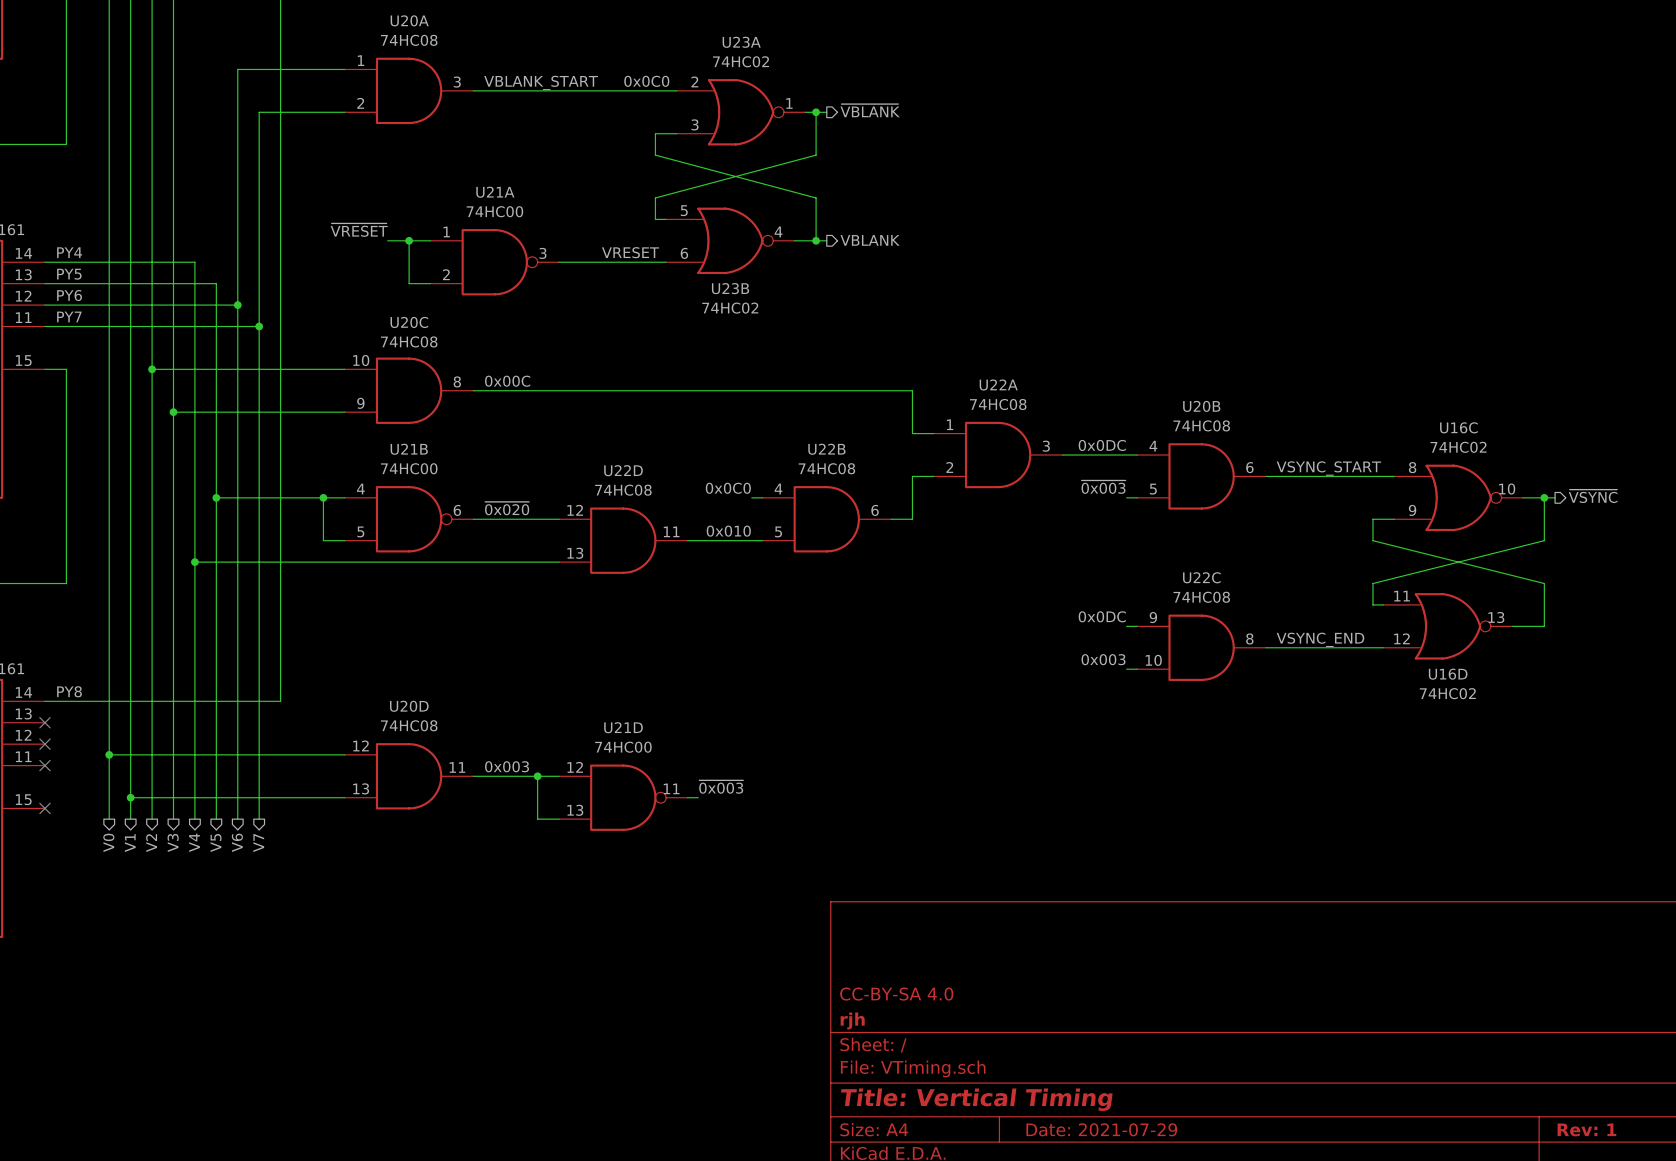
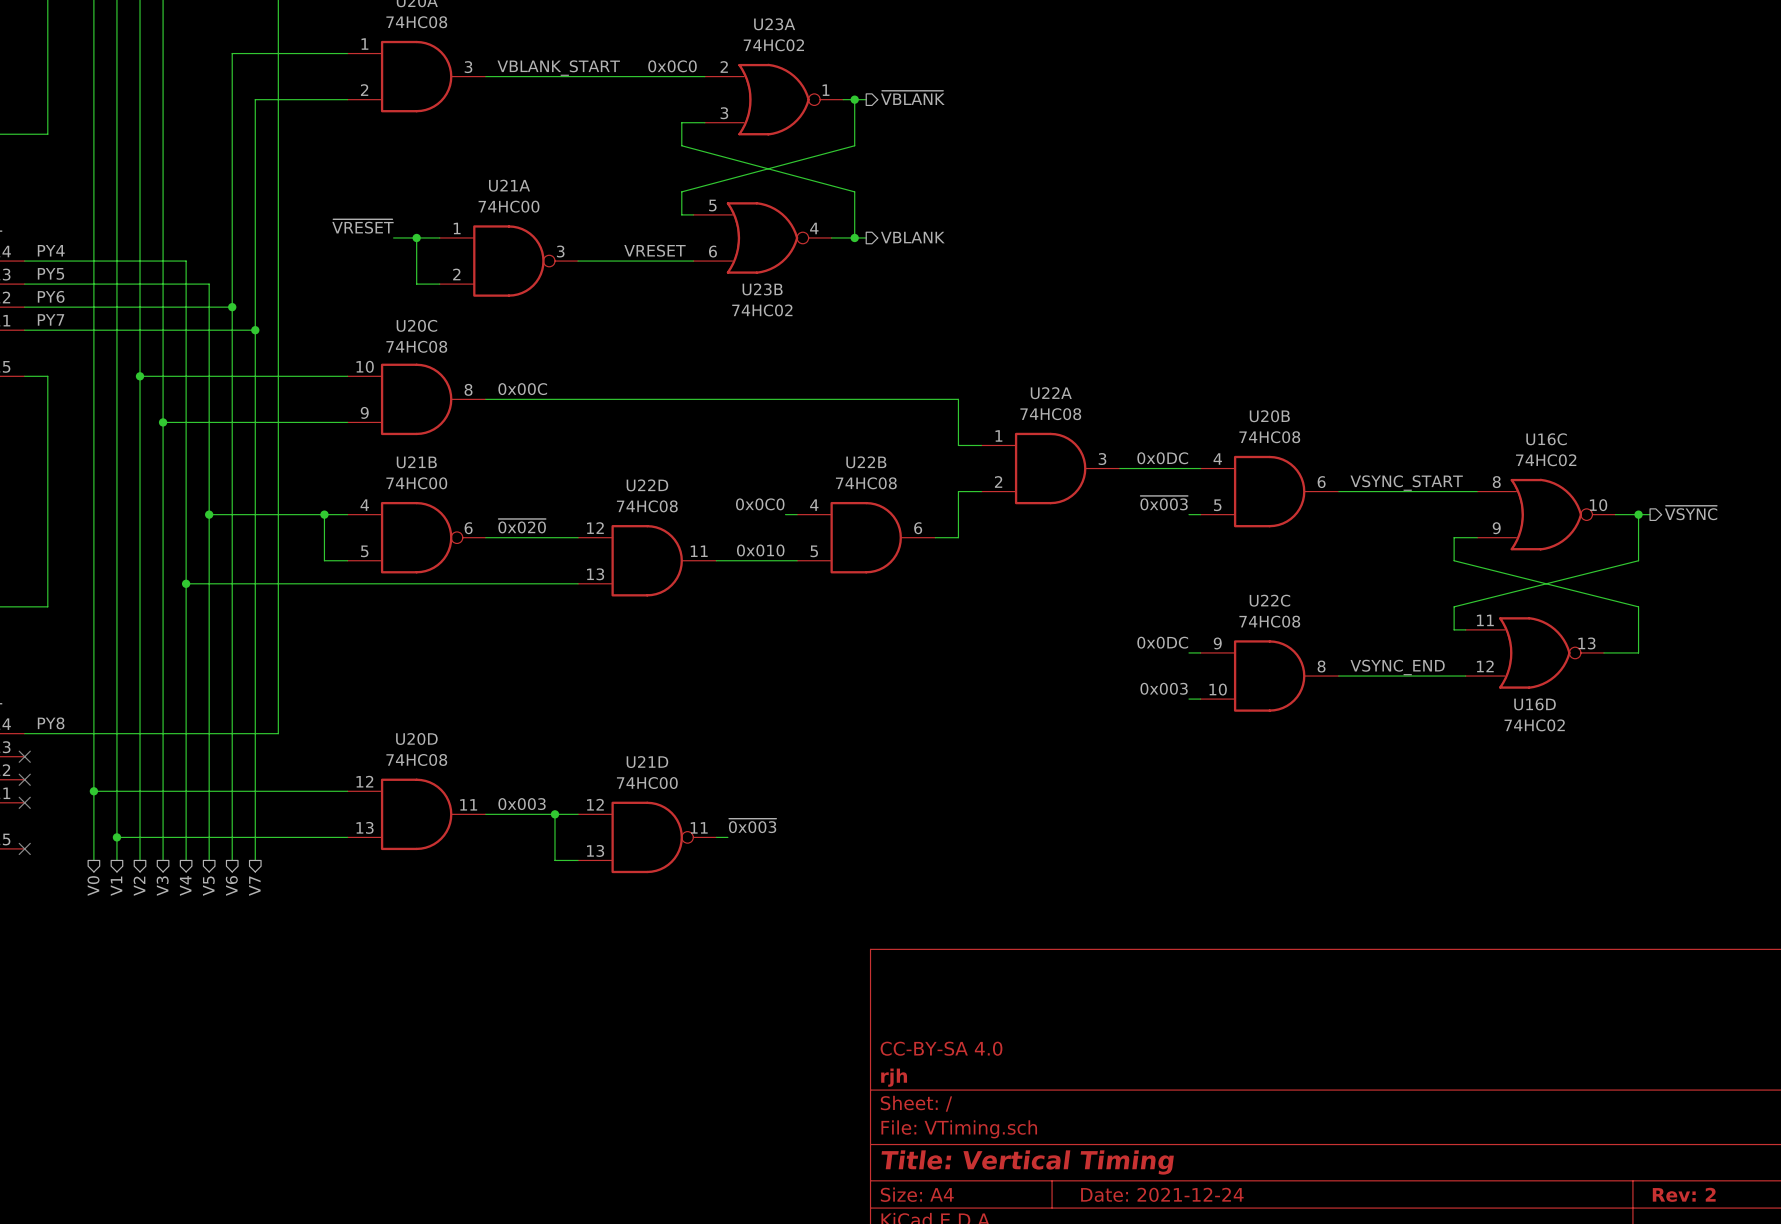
title block: Date: 2021-07-29 (1101, 1129) -> Date: 2021-12-24 (1162, 1194)
title block: Rev: 1 (1586, 1129) -> Rev: 2 (1684, 1194)

